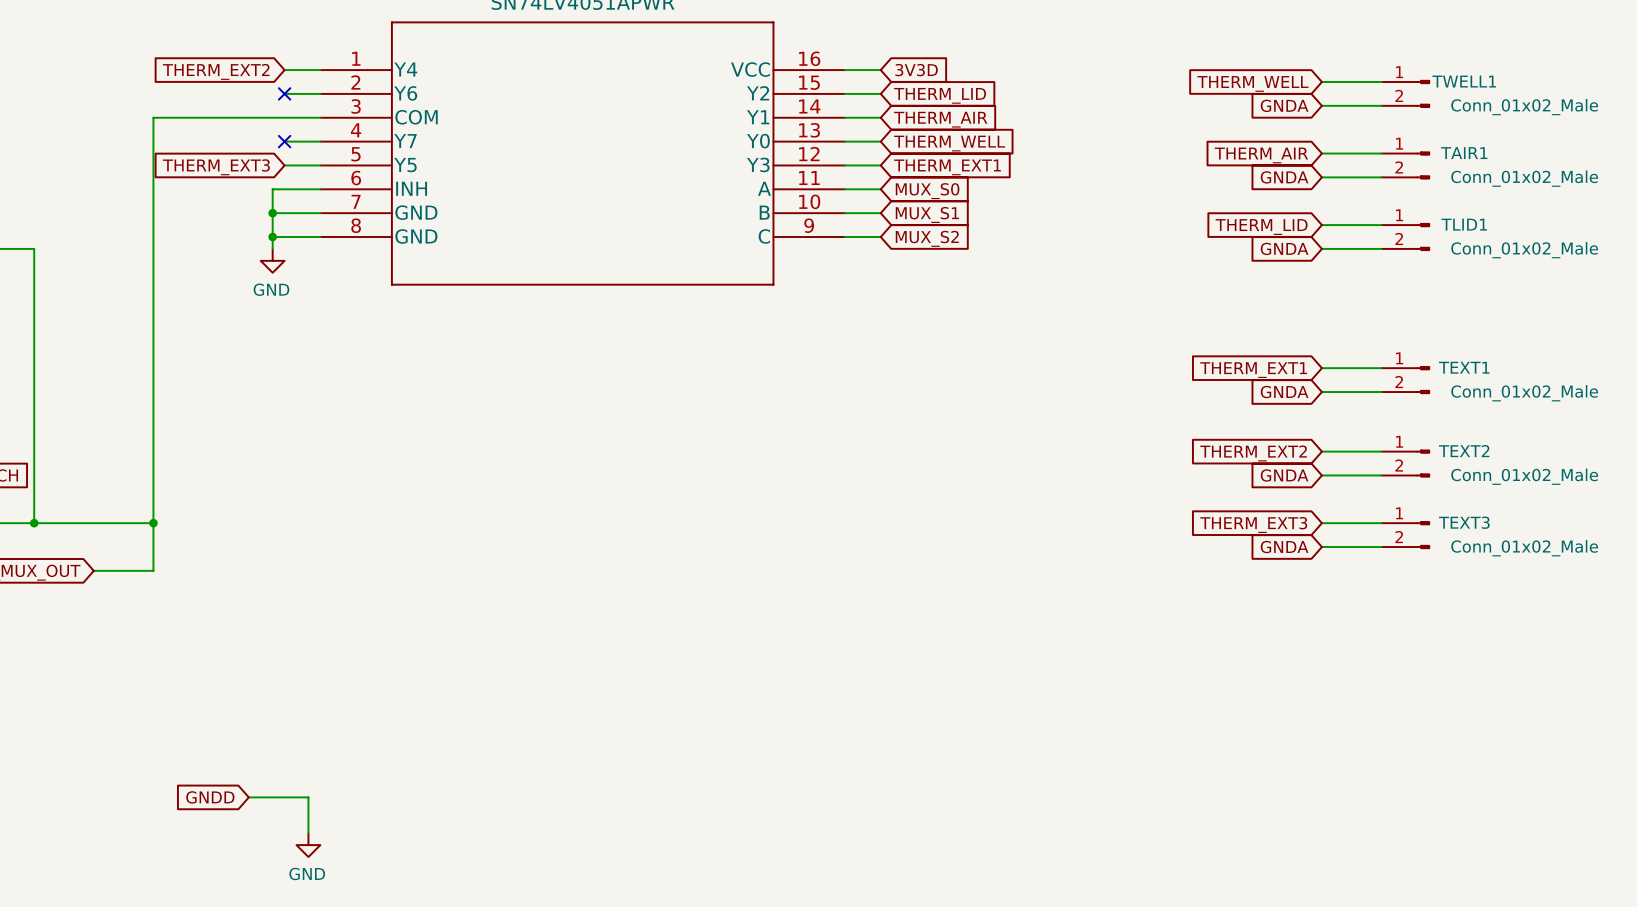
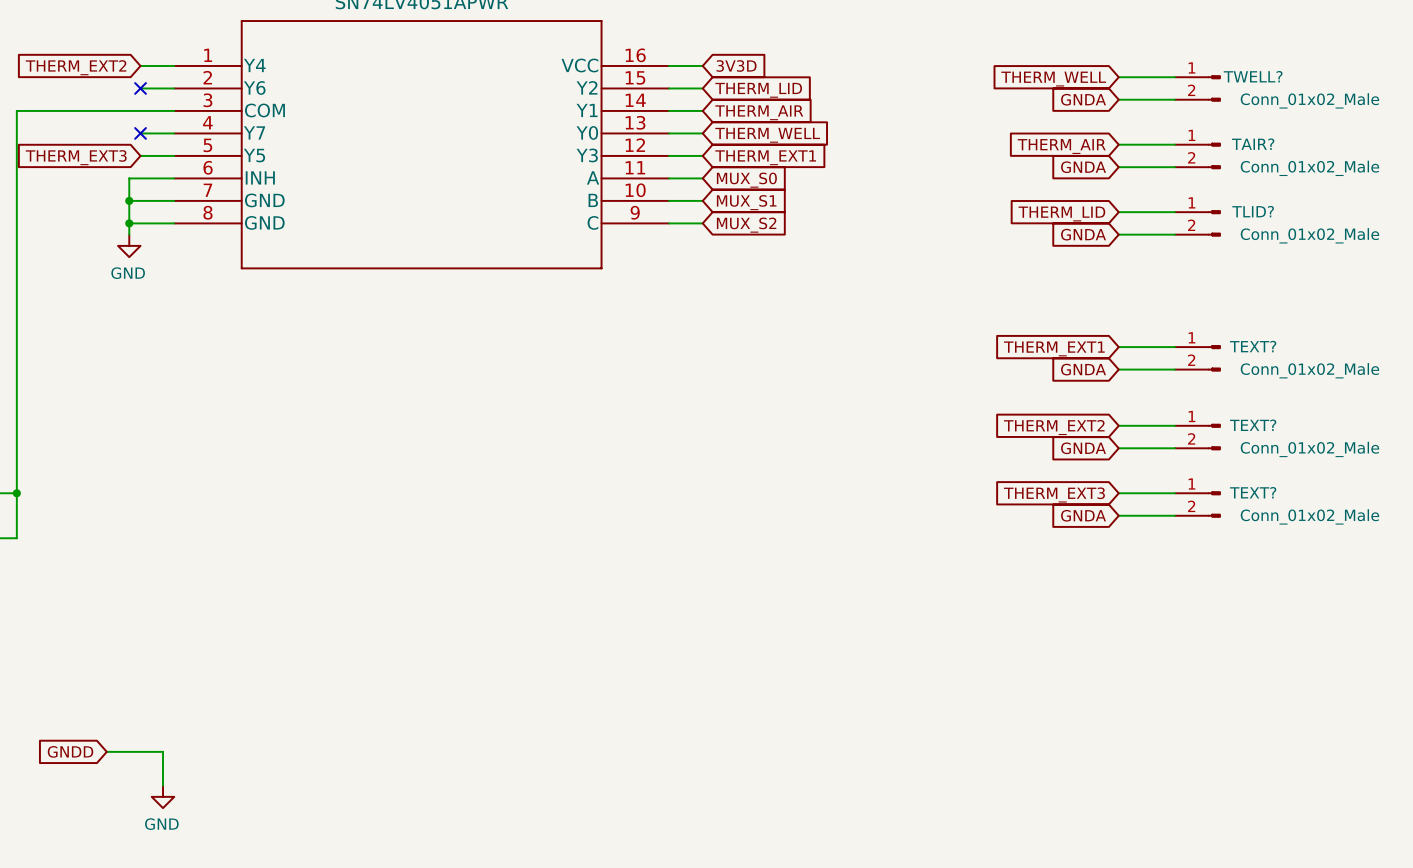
TWELL1 name: TWELL1 (1464, 81) -> TWELL? (1253, 76)
TAIR1 name: TAIR1 (1464, 153) -> TAIR? (1253, 144)
TLID1 name: TLID1 (1464, 224) -> TLID? (1253, 211)
TEXT1 name: TEXT1 (1464, 367) -> TEXT? (1253, 346)
TEXT2 name: TEXT2 (1464, 451) -> TEXT? (1253, 425)
TEXT3 name: TEXT3 (1464, 522) -> TEXT? (1253, 492)

